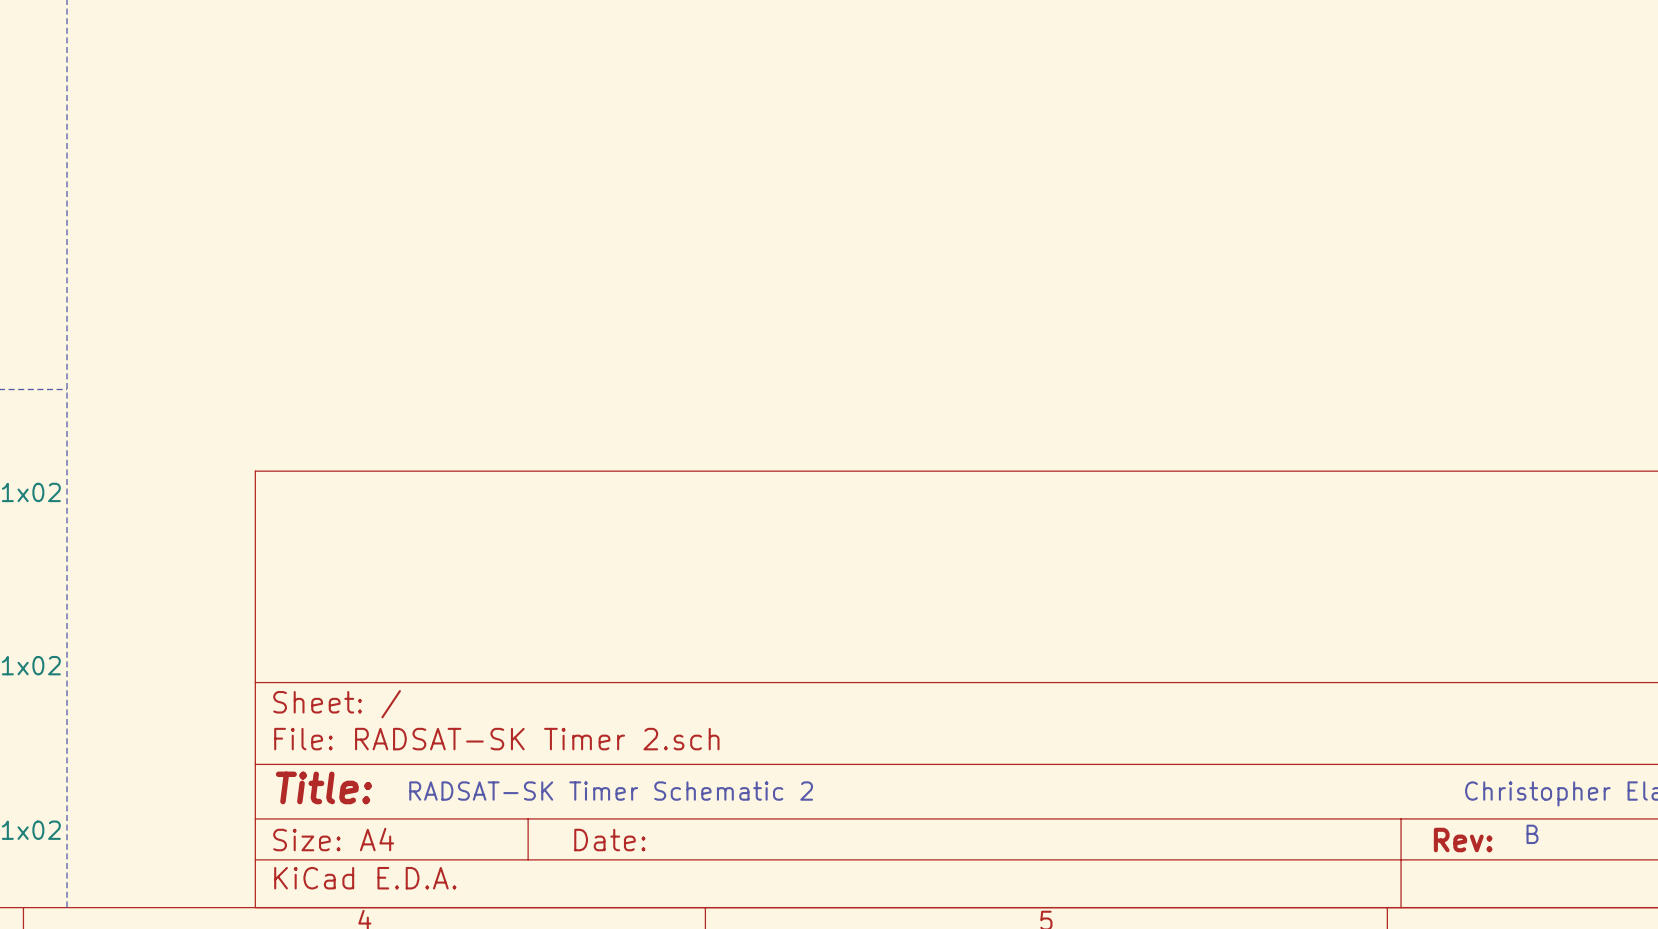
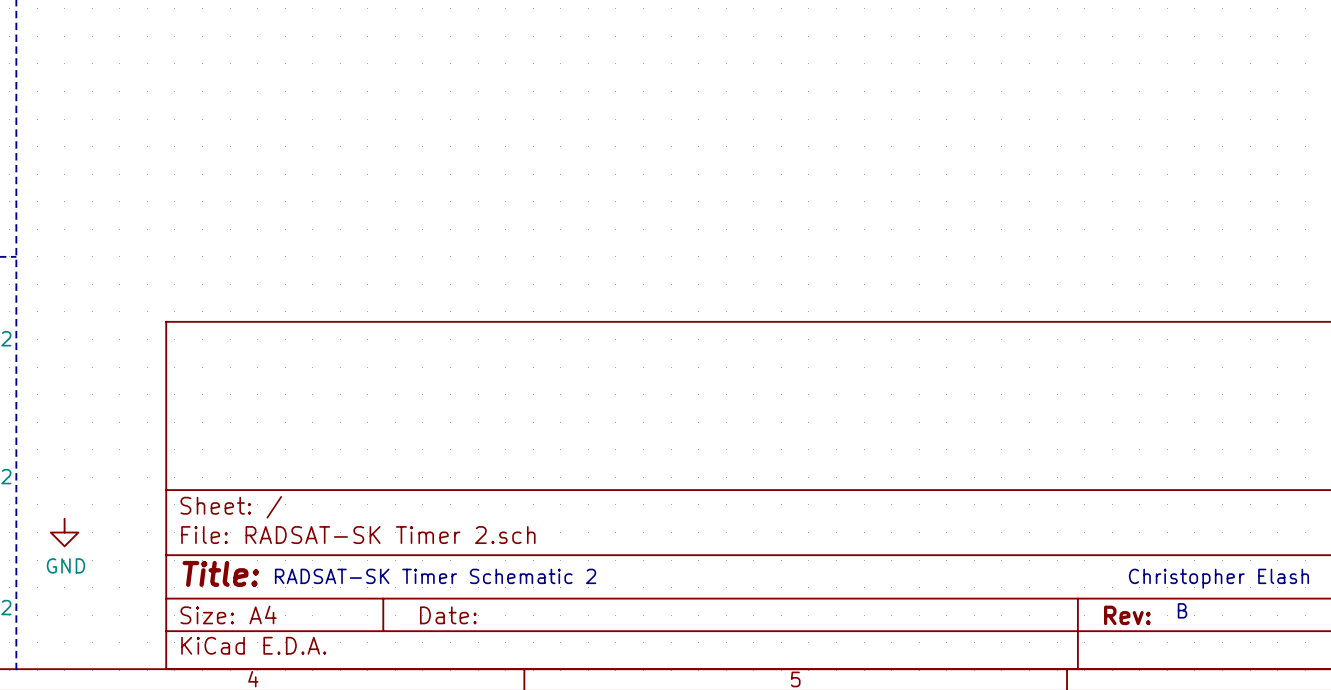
power symbol: none -> GND (64, 532)
text position: RADSAT-SK Timer Schematic 2 (611, 791) -> RADSAT-SK Timer Schematic 2 (435, 576)

